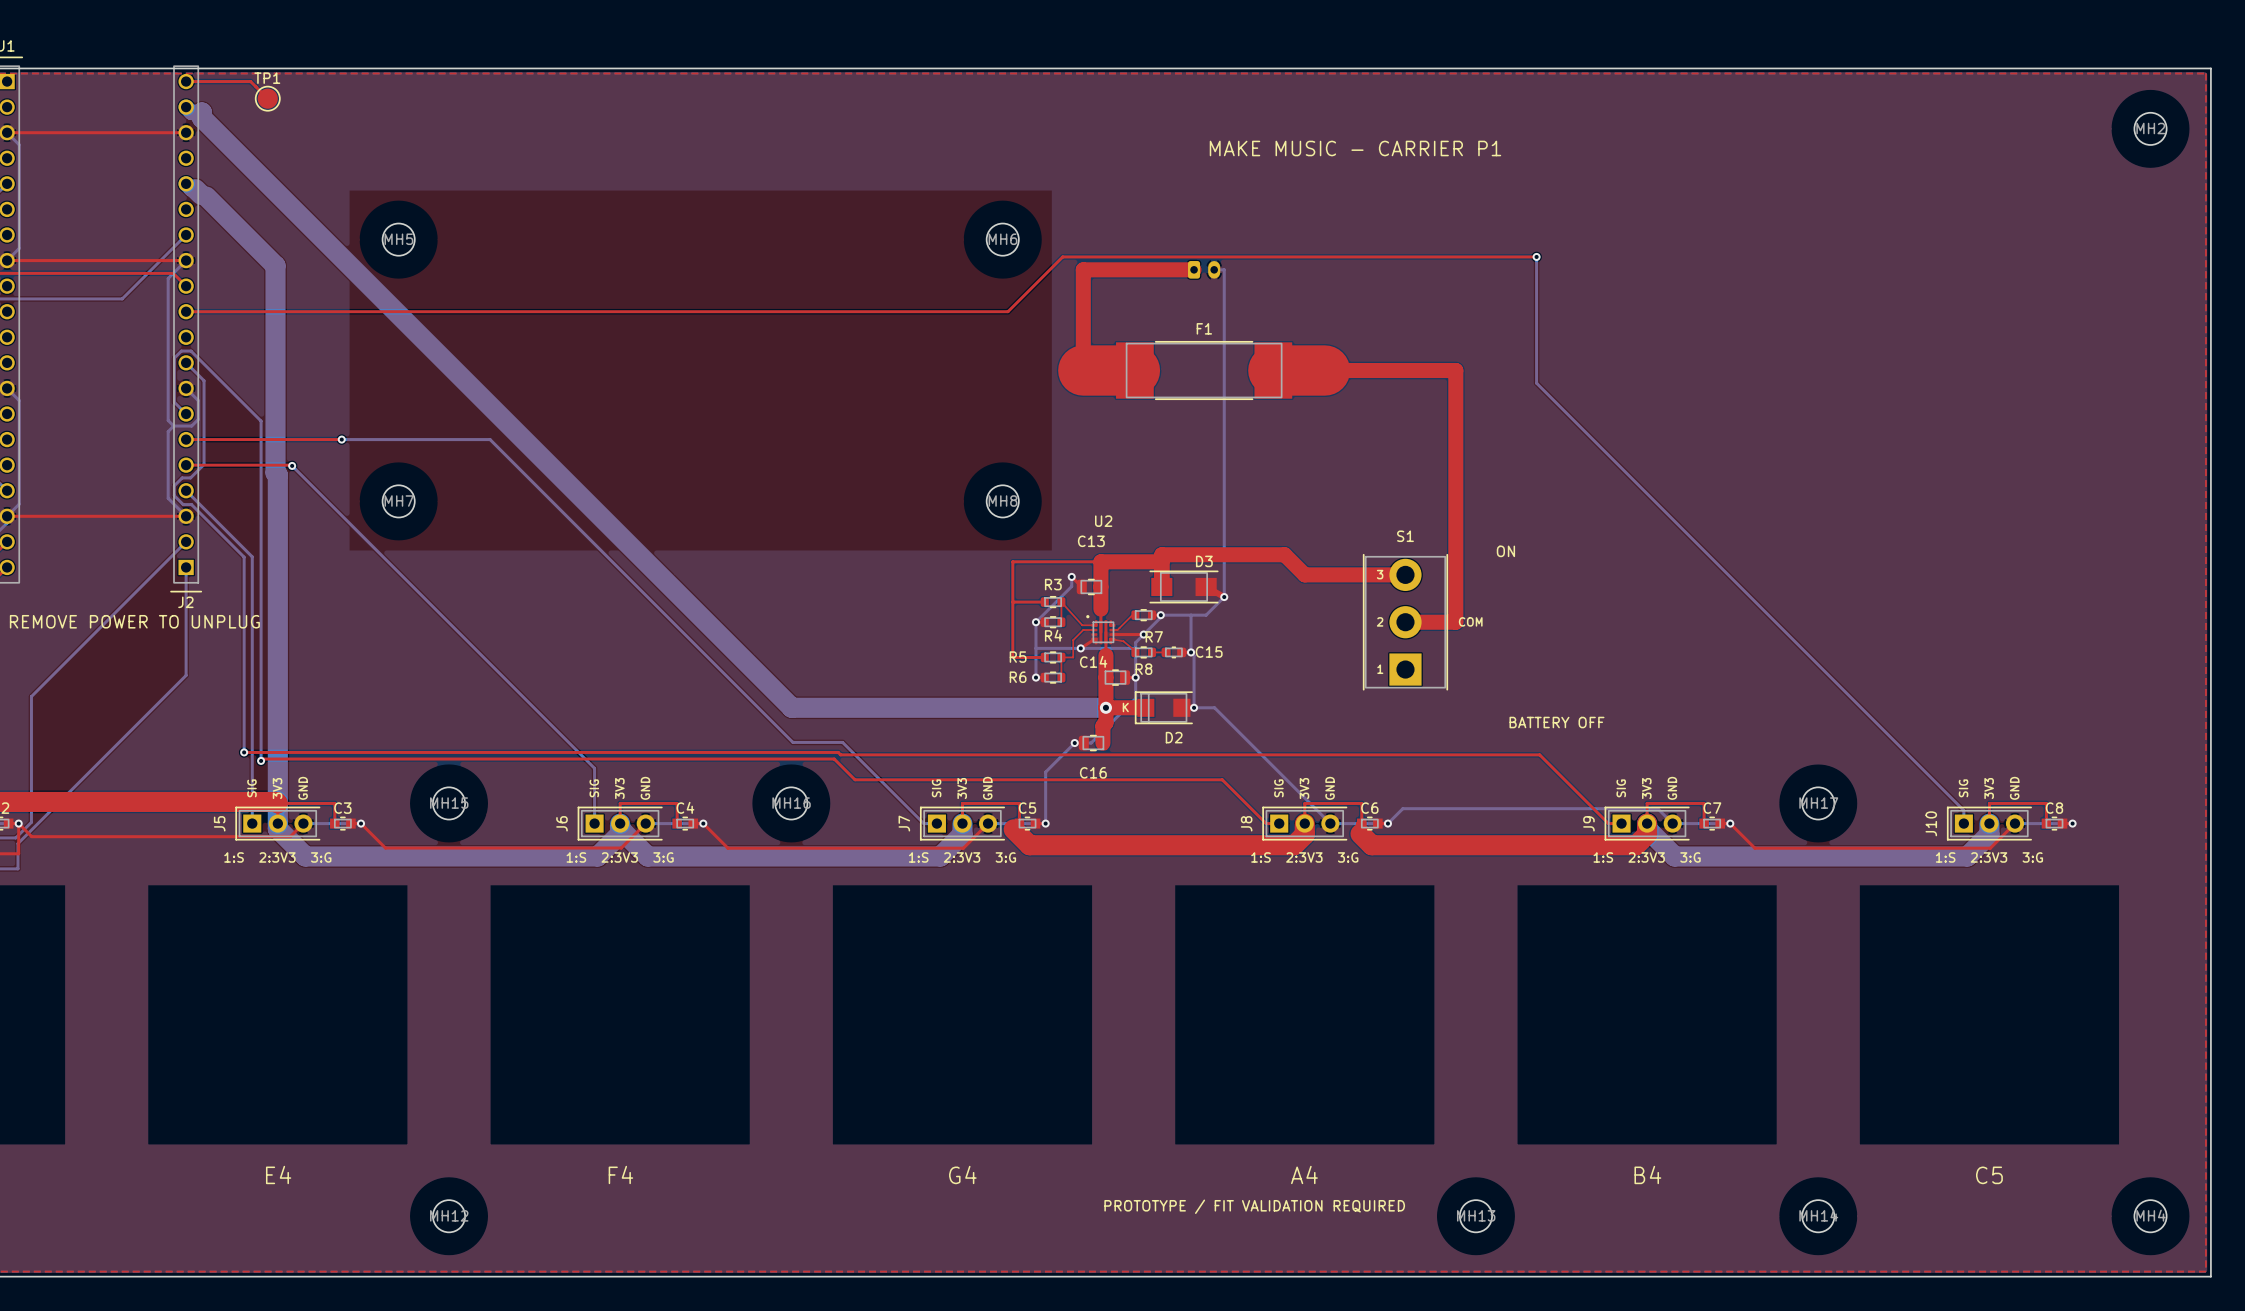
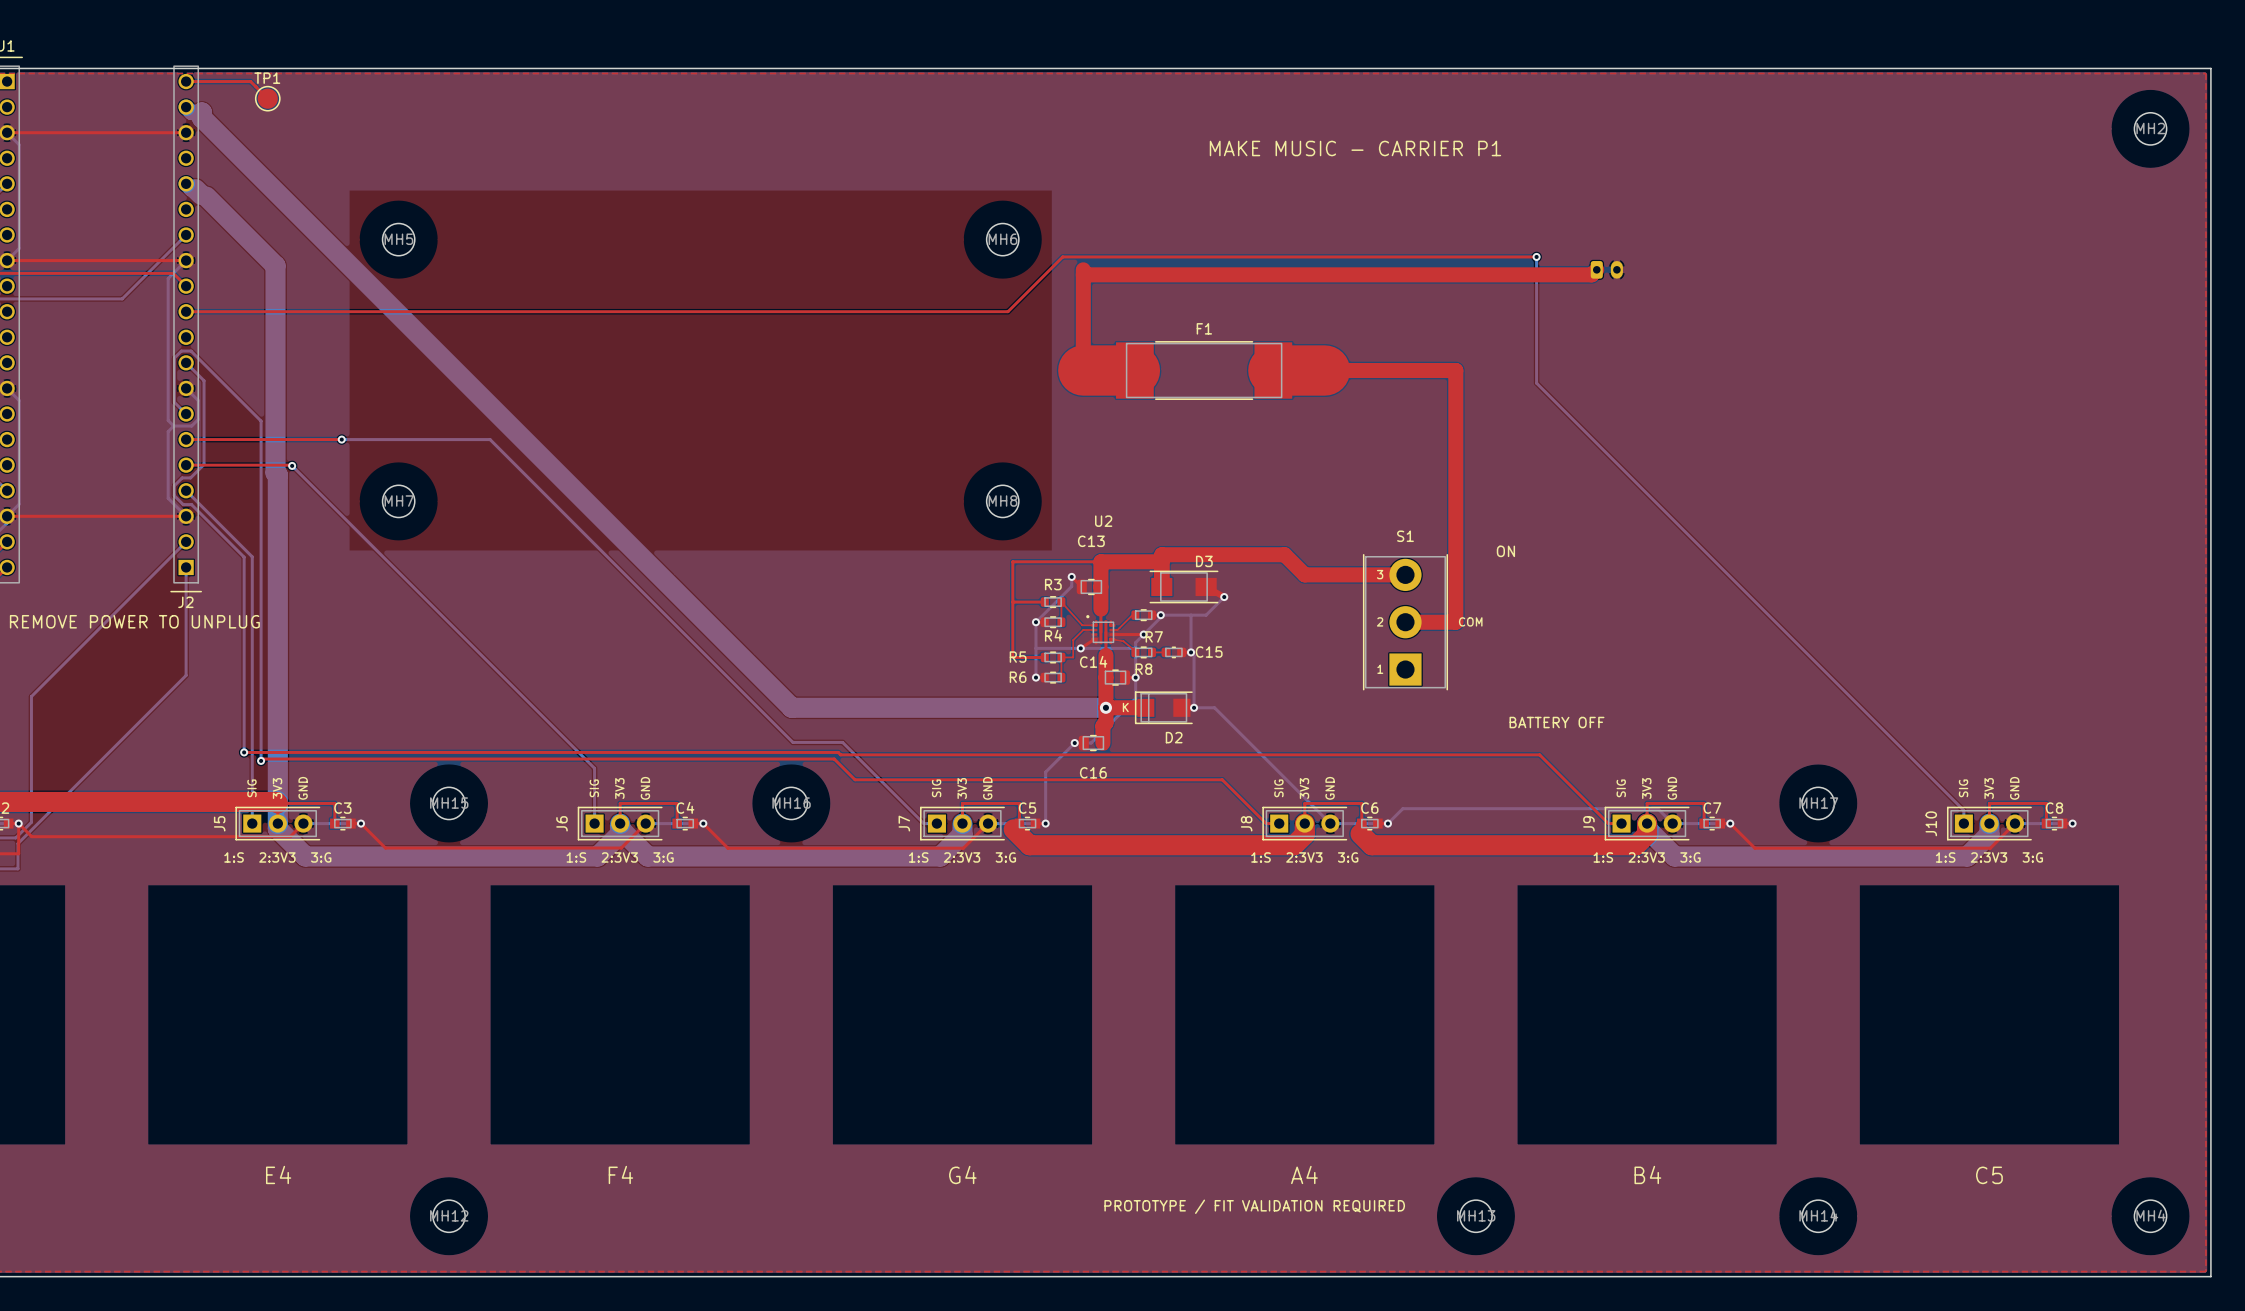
top track: (1083, 269) (1194, 269) -> none
part: (1204, 269) -> none
bottom track: (1214, 269) (1224, 269) (1224, 597) -> none
top track: none -> (1596, 269) (1591, 274) (1083, 274)
part: none -> (1606, 269)

